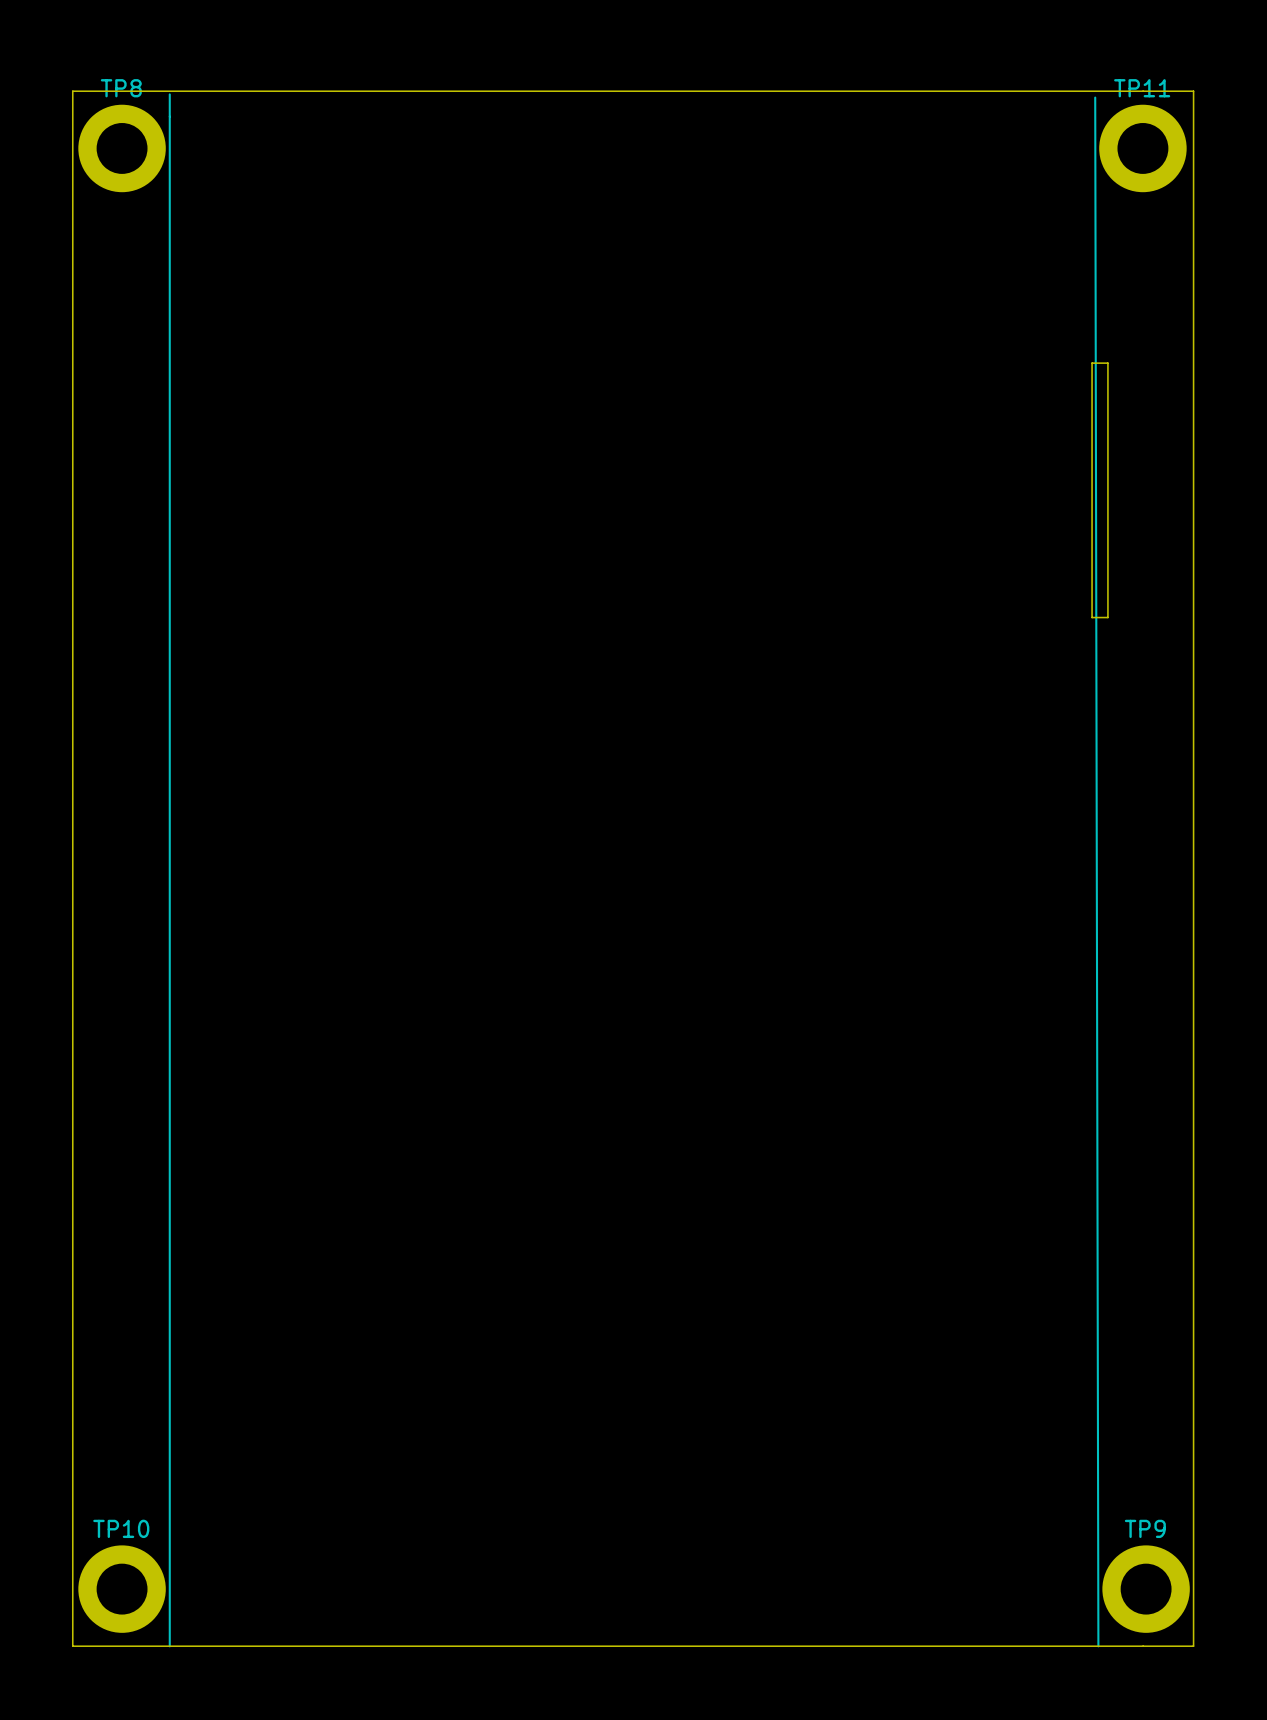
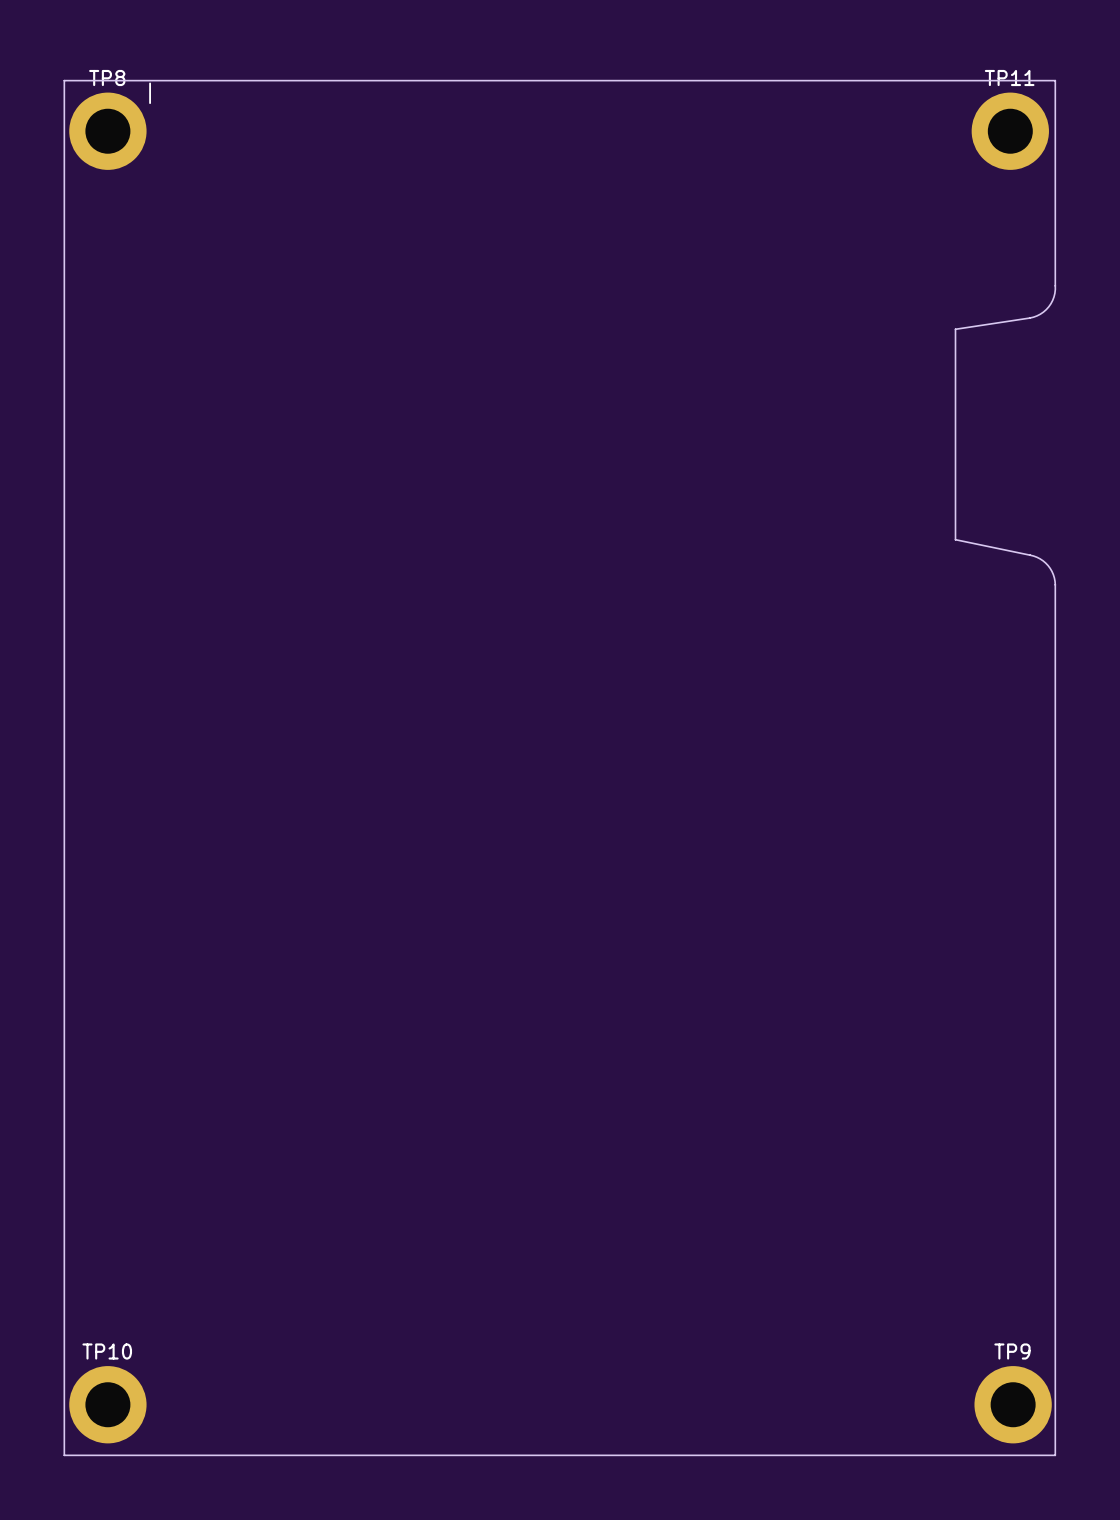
board edge: (1193, 91) (1193, 1646) (72, 1646) -> (1055, 80) (1055, 289) (1052, 300) (1046, 309) (1033, 317) (955, 329) (955, 539) (1036, 557) (1050, 568) (1055, 581) (1055, 1455) (64, 1455)
line: (1095, 97) (1098, 1646) -> none
line: (169, 116) (169, 1646) -> none
board edge: (1092, 363) (1092, 617) (1107, 617) (1107, 363) (1092, 363) -> none

